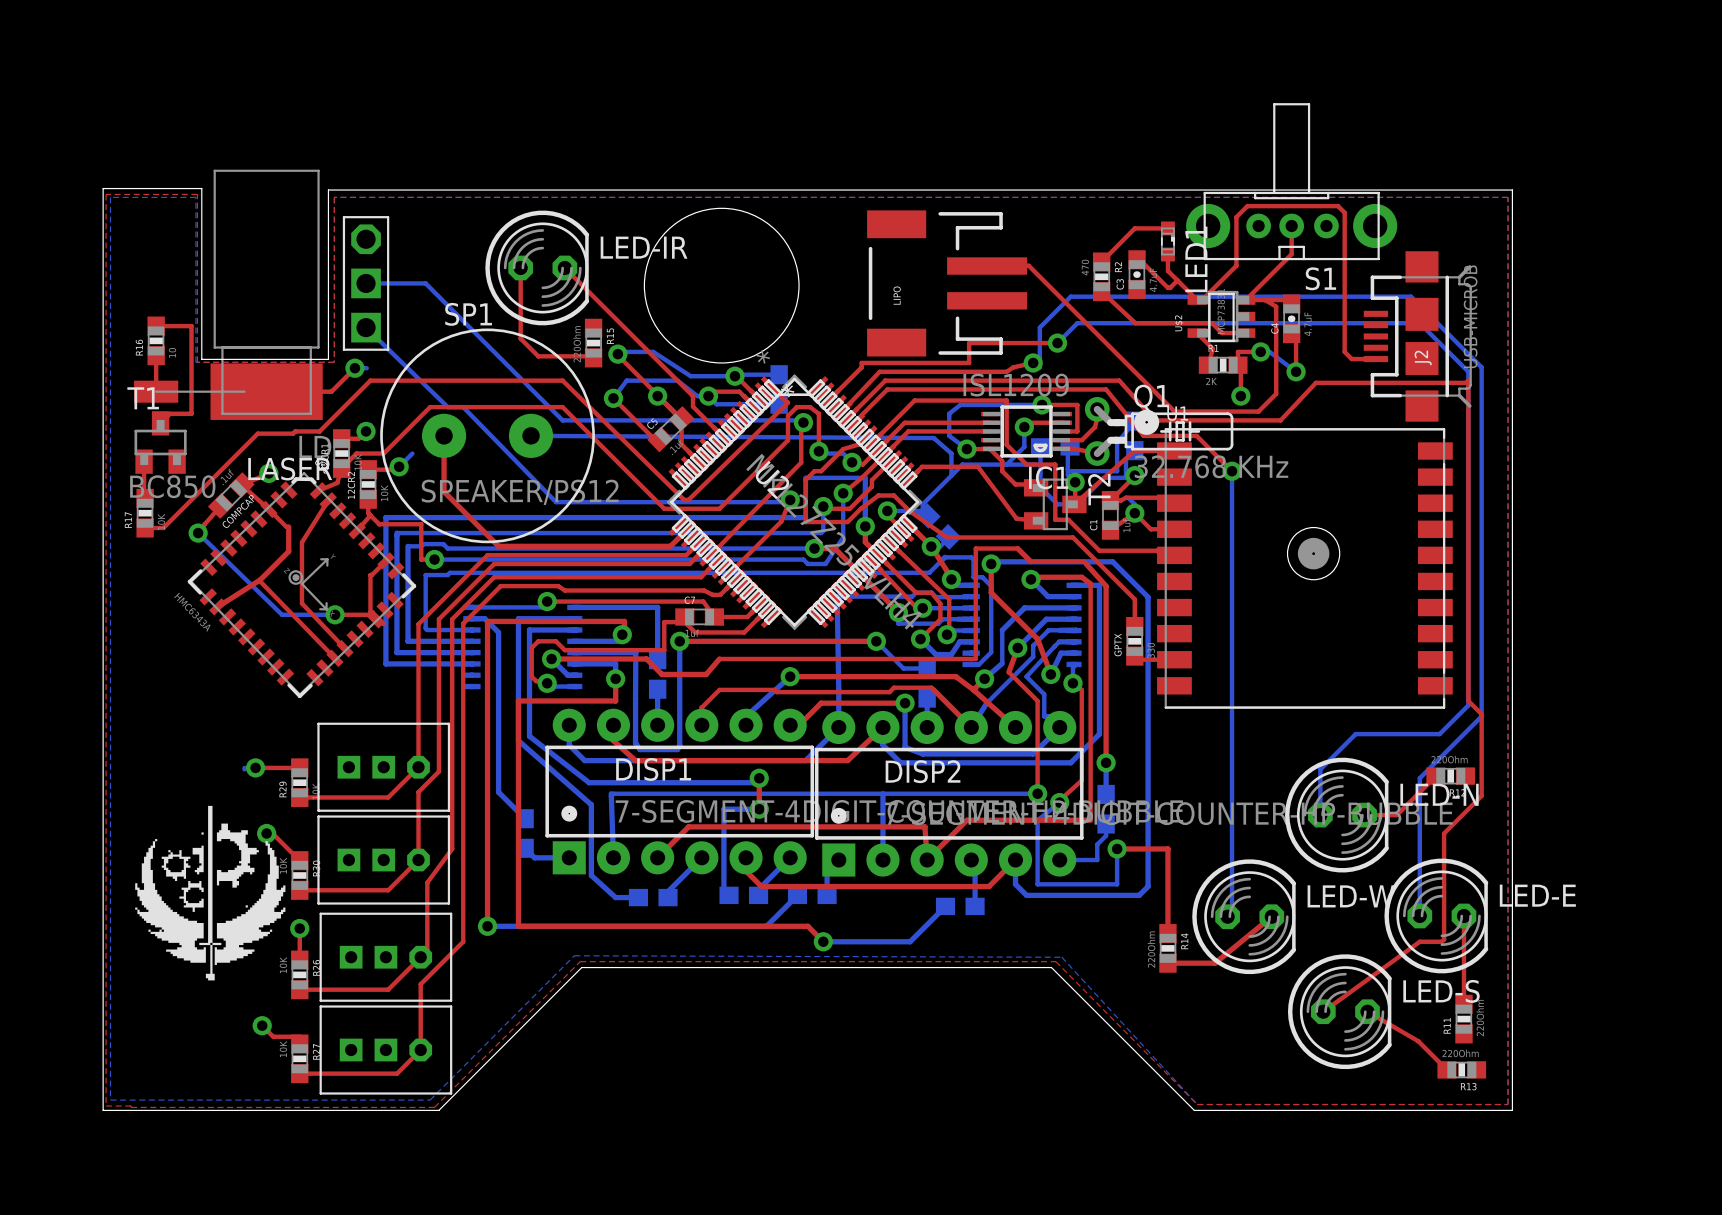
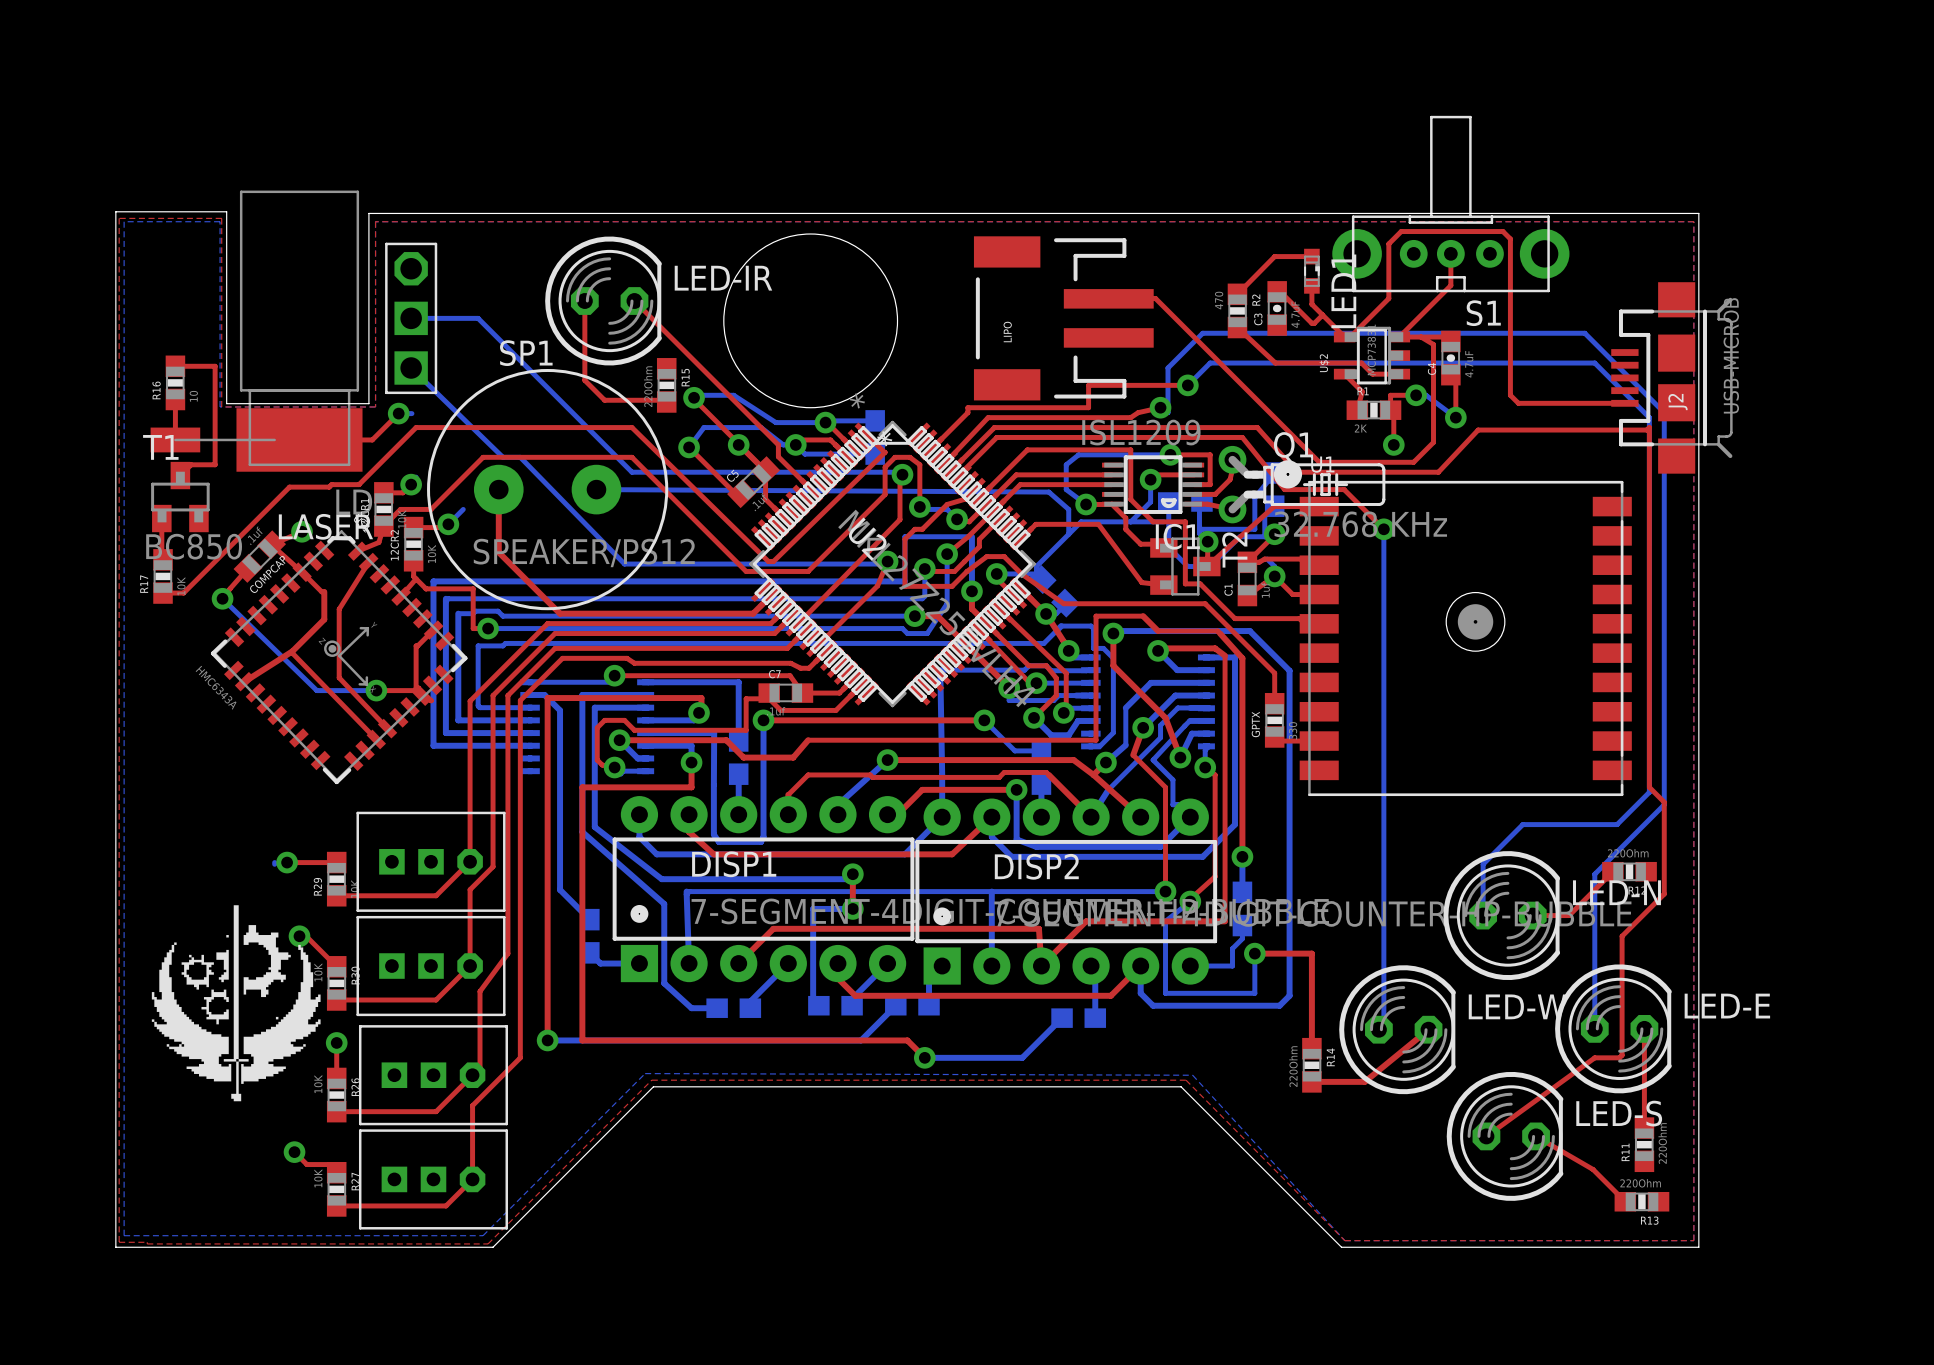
J2 position: (1417, 336) -> (1671, 377)
top track: none -> (1545, 403) (1624, 403)

